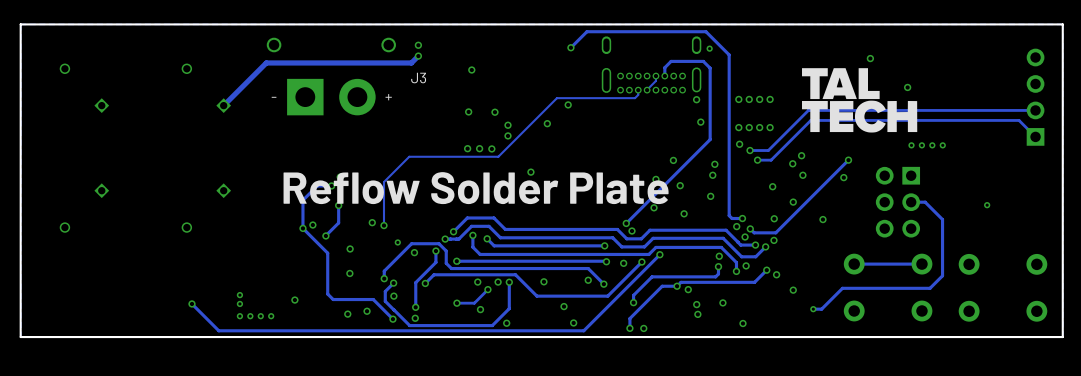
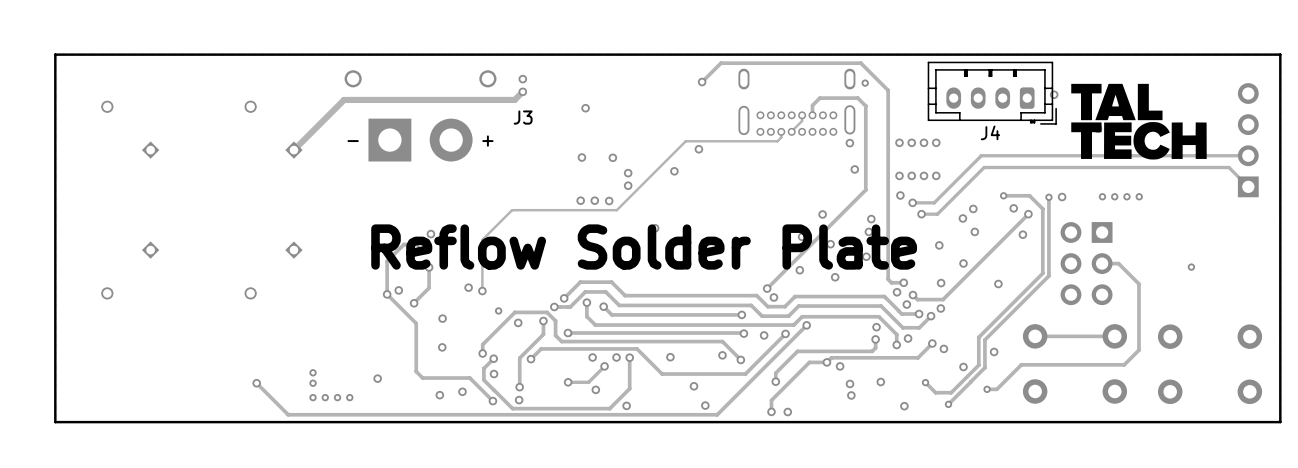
J4: none -> (992, 93)
drawing position: (859, 100) -> (1138, 121)
track: none -> (1003, 195) (1029, 195) (1042, 208) (1042, 273) (978, 337) (978, 365) (951, 392) (935, 392) (925, 382)
via: none -> (1003, 195)
track: none -> (1048, 197) (1048, 275) (984, 339) (984, 367) (970, 381)
via: none -> (1048, 197)
via: none -> (1062, 197)
via: none -> (1013, 208)
via: none -> (994, 351)
track: none -> (970, 382) (948, 404)
via: none -> (925, 382)
via: none -> (948, 404)

